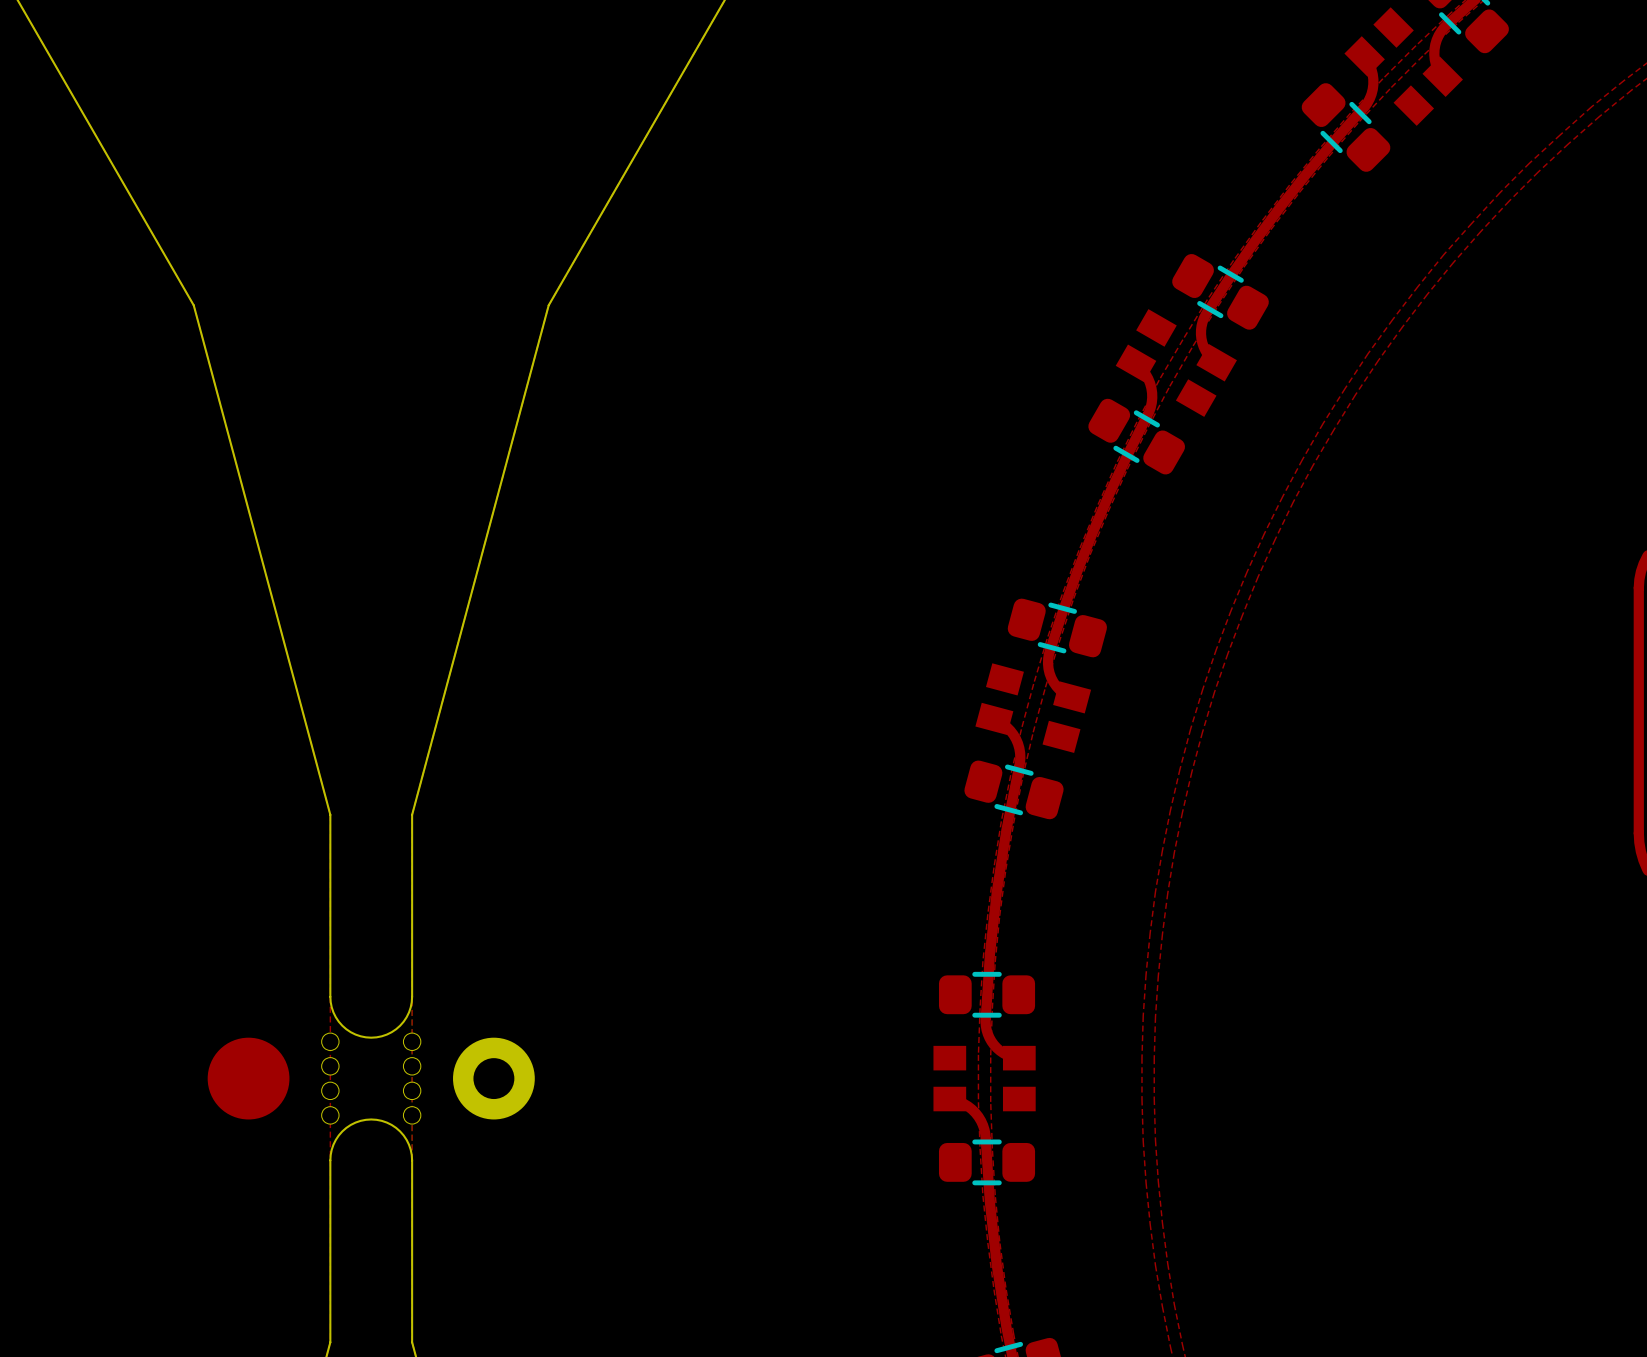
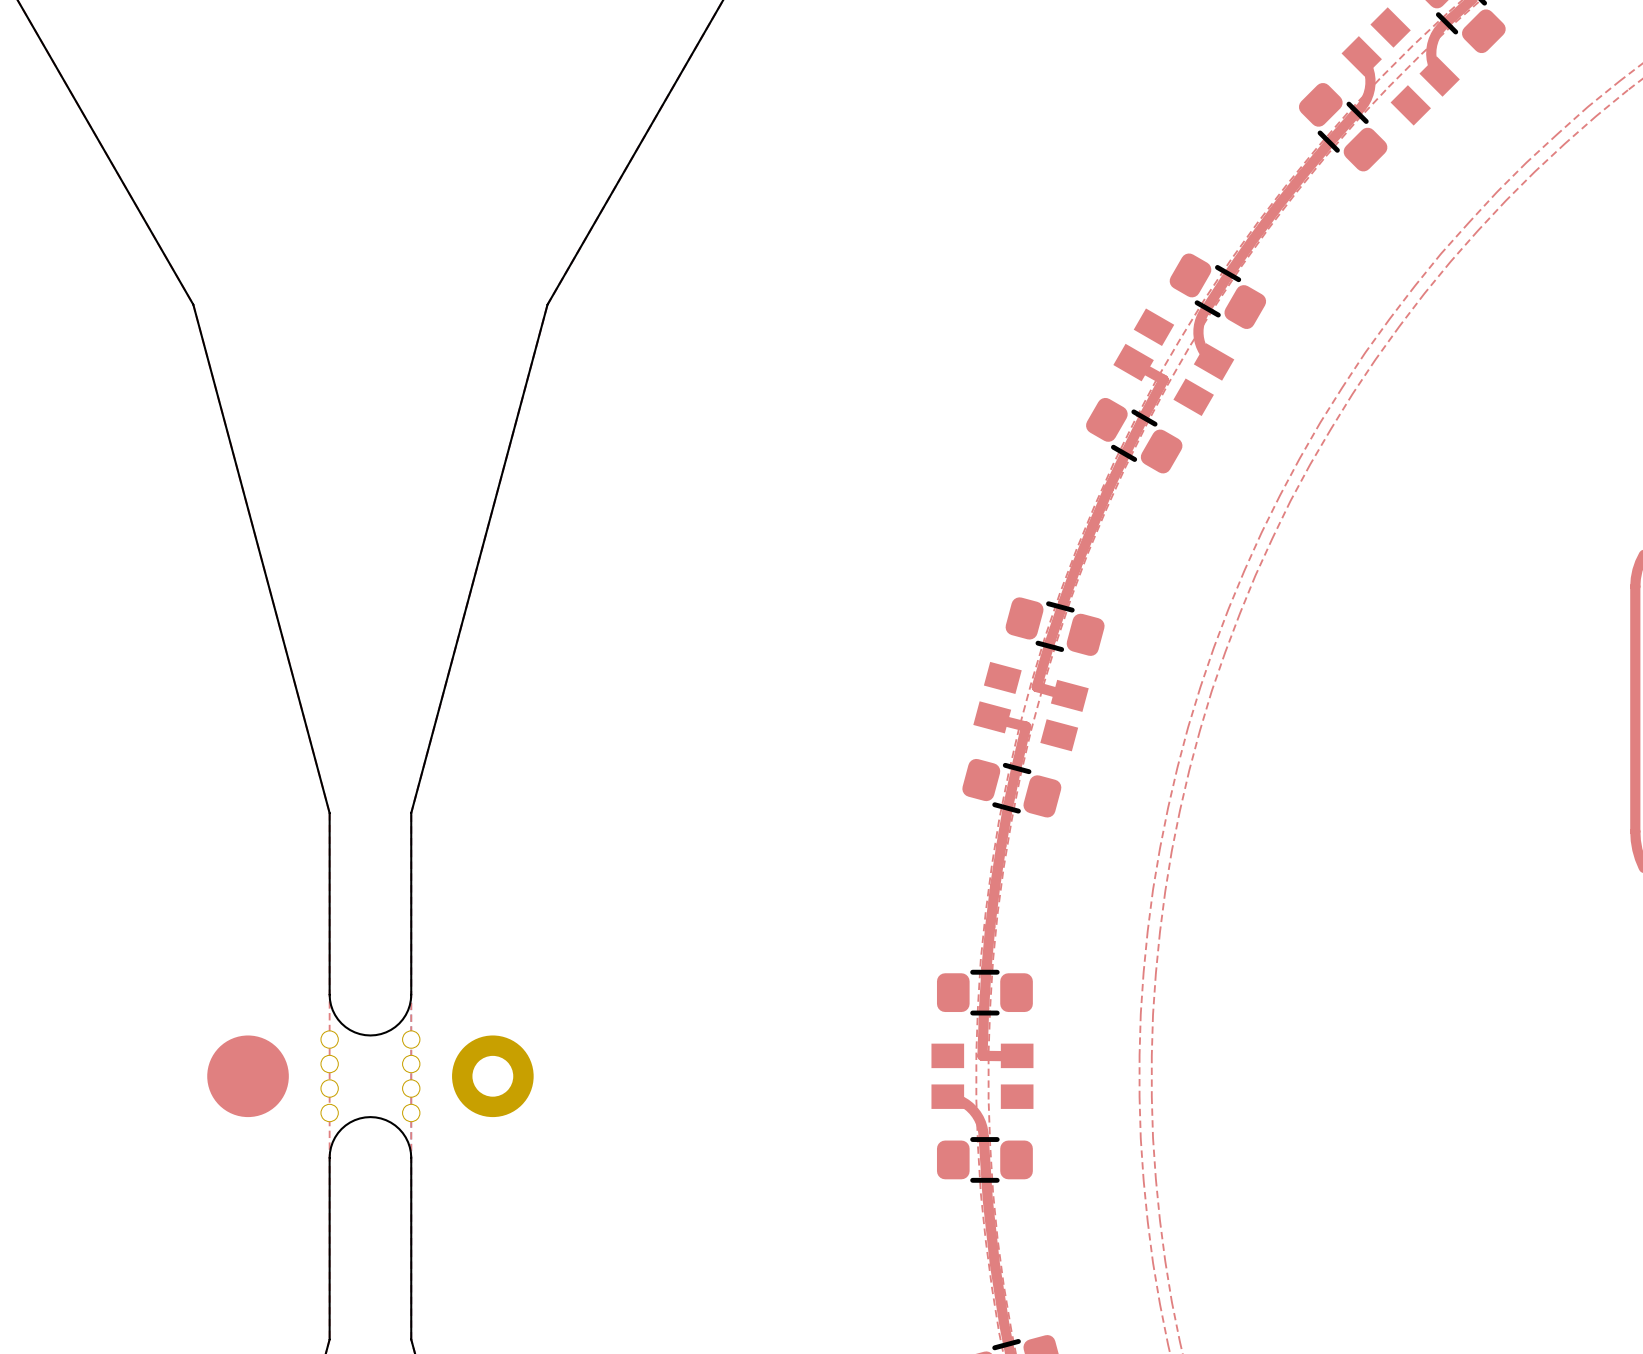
top track: (1135, 363) (1145, 374) (1150, 383) (1152, 392) (1150, 407) (1093, 530) (1049, 653) (1048, 668) (1053, 682) (1063, 693) (1072, 697) -> (1133, 363) (1163, 379) (1126, 452) (1092, 526) (1063, 602) (1036, 687) (1069, 696)
top track: (994, 719) (1006, 727) (1013, 734) (1017, 743) (1020, 758) (996, 891) (989, 954) (985, 1025) (989, 1037) (996, 1047) (1007, 1055) (1019, 1058) -> (992, 718) (1026, 726) (1008, 806) (995, 886) (986, 967) (982, 1055) (1017, 1056)

